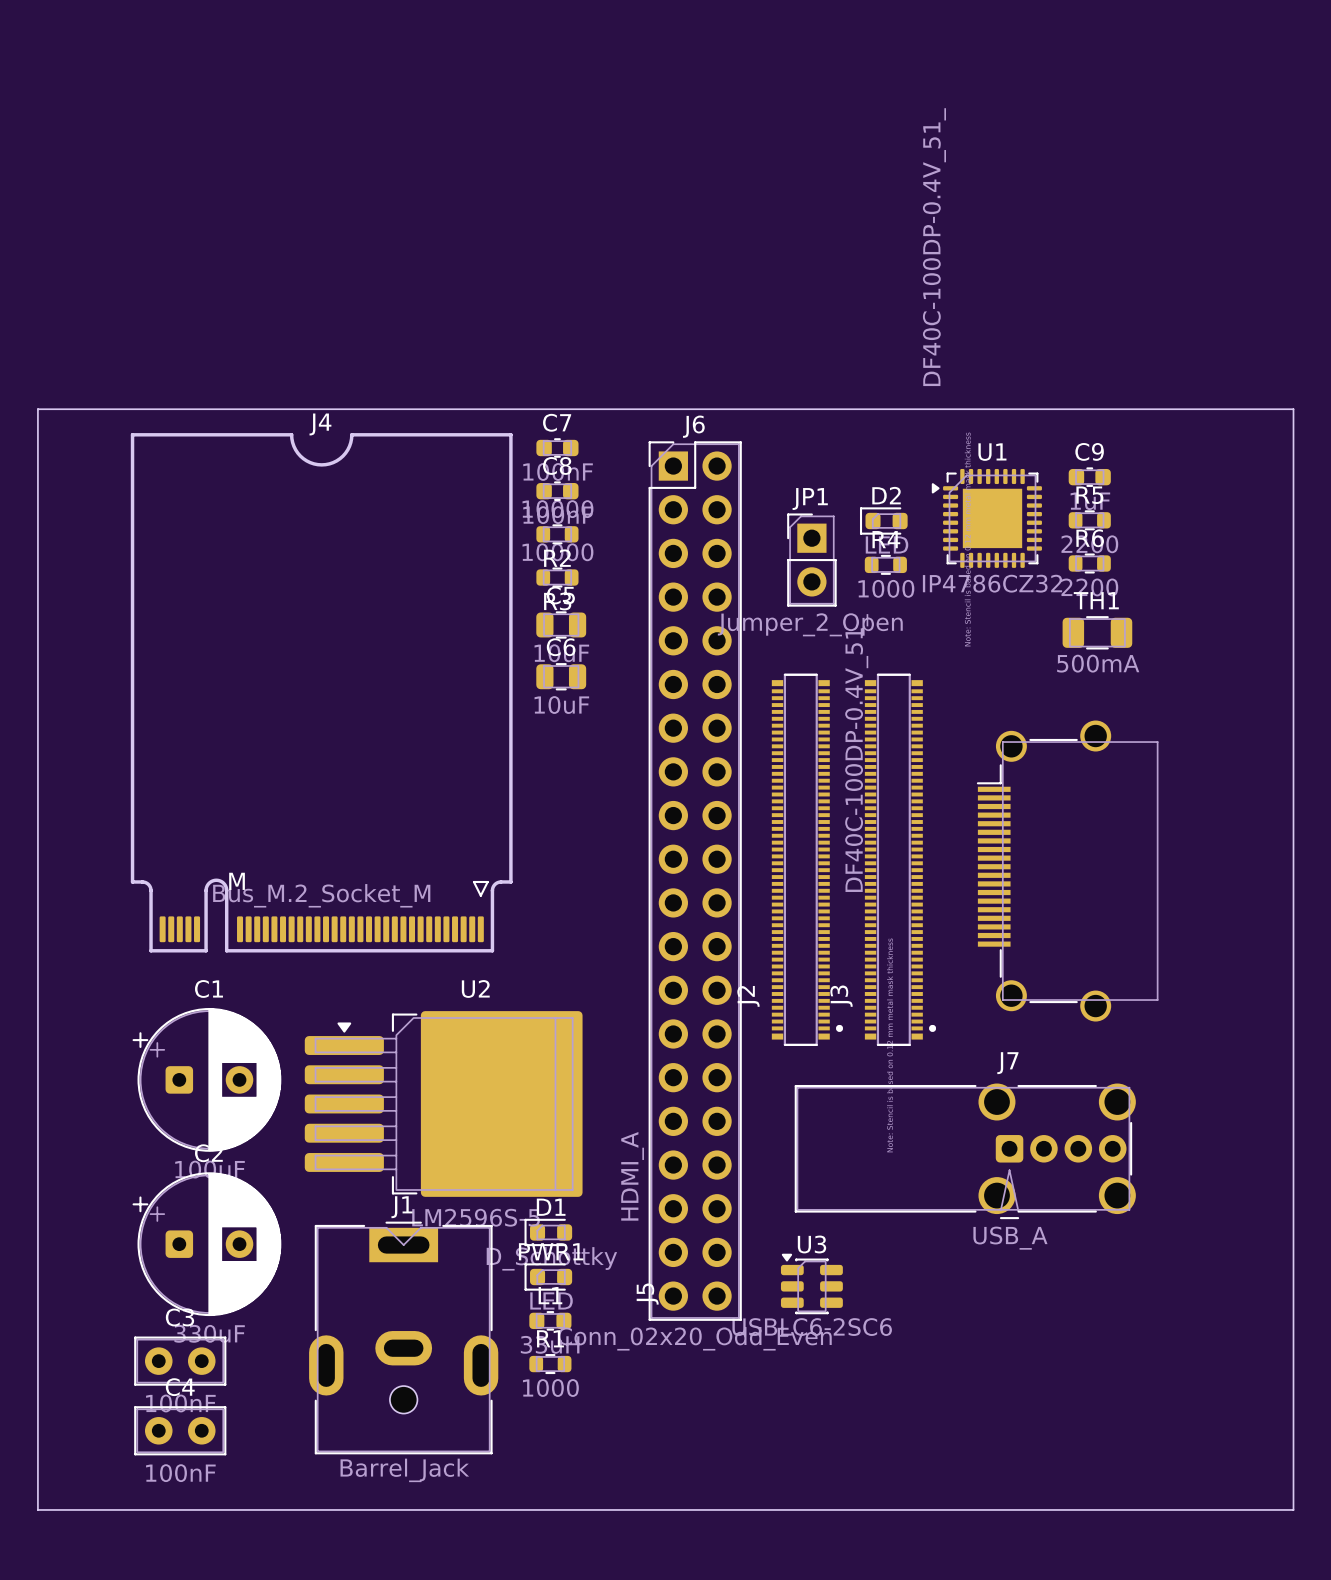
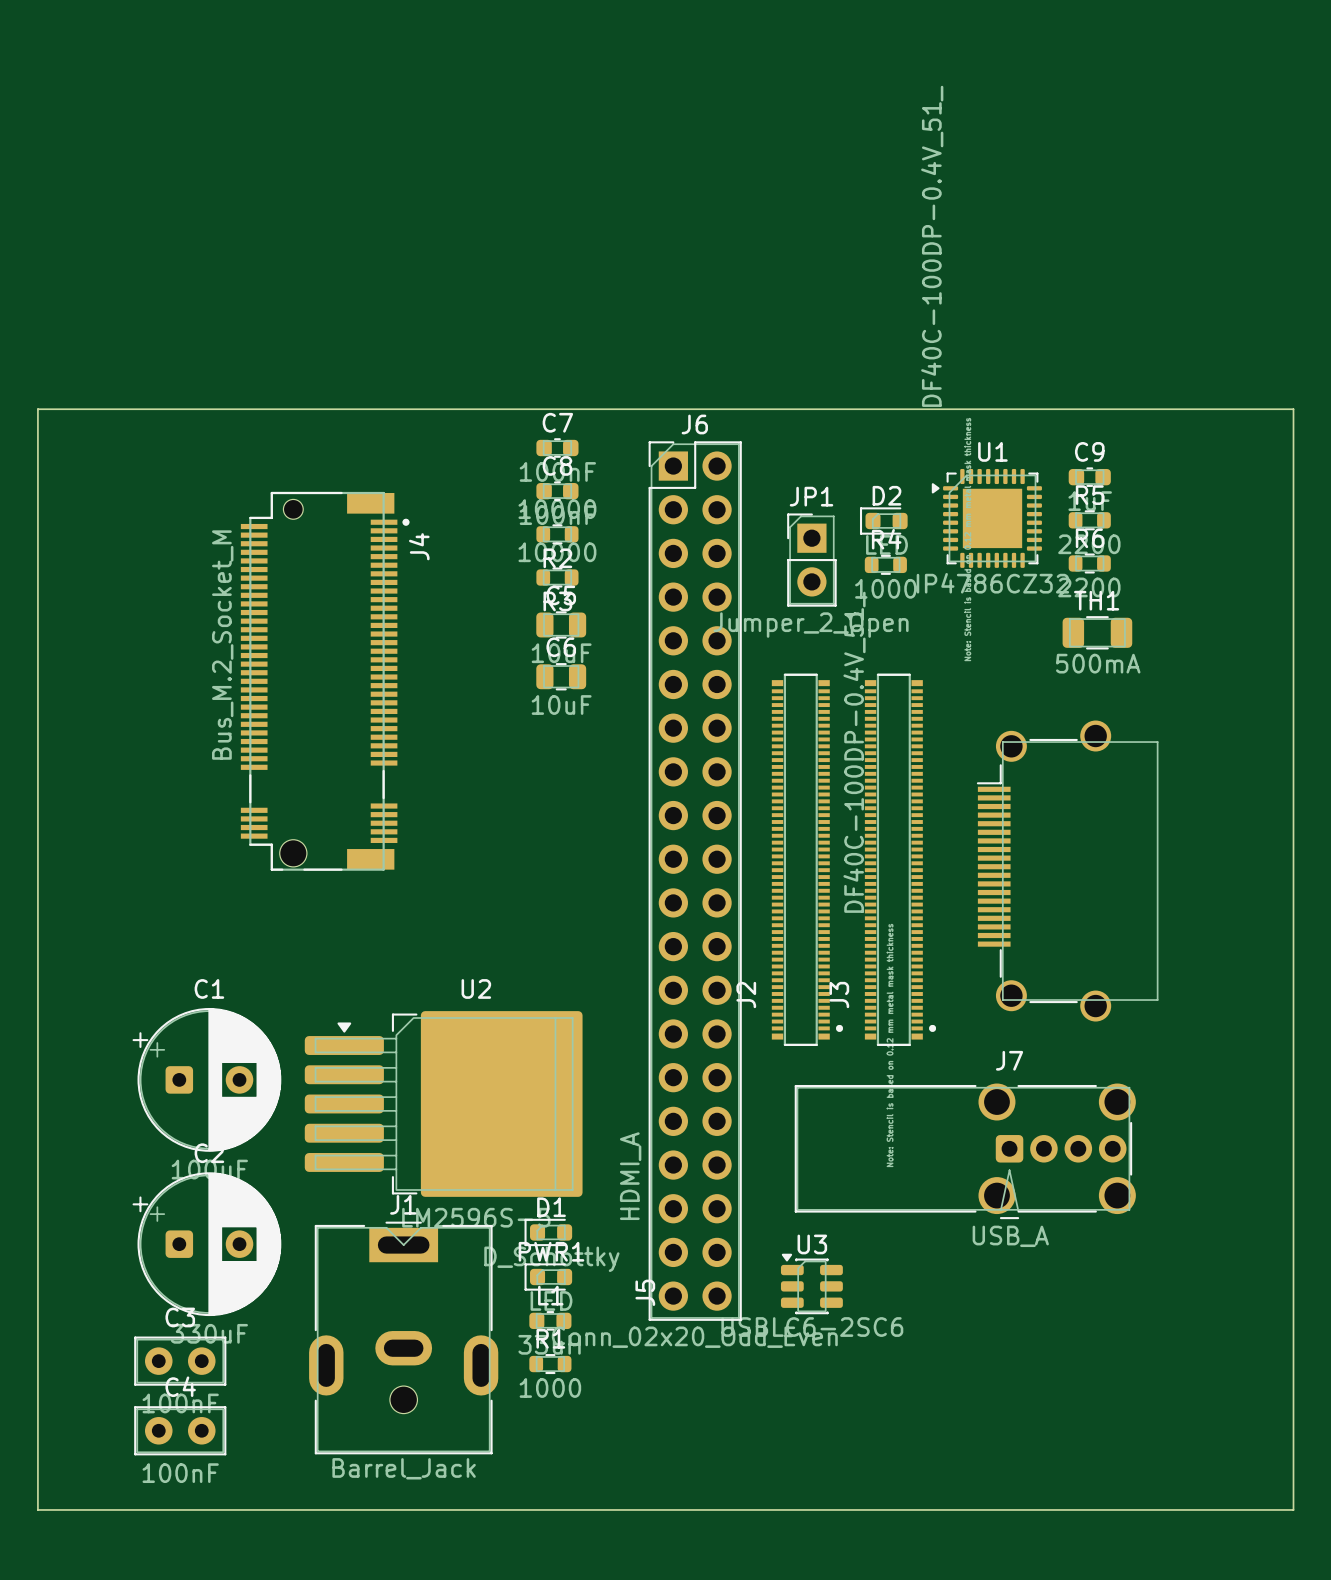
J4 name position: J4 (320, 424) -> J4 (419, 546)
J4 footprint: [130, 433, 513, 953] -> [240, 491, 410, 871]
J4 value position: Bus_M.2_Socket_M (321, 895) -> Bus_M.2_Socket_M (222, 645)

